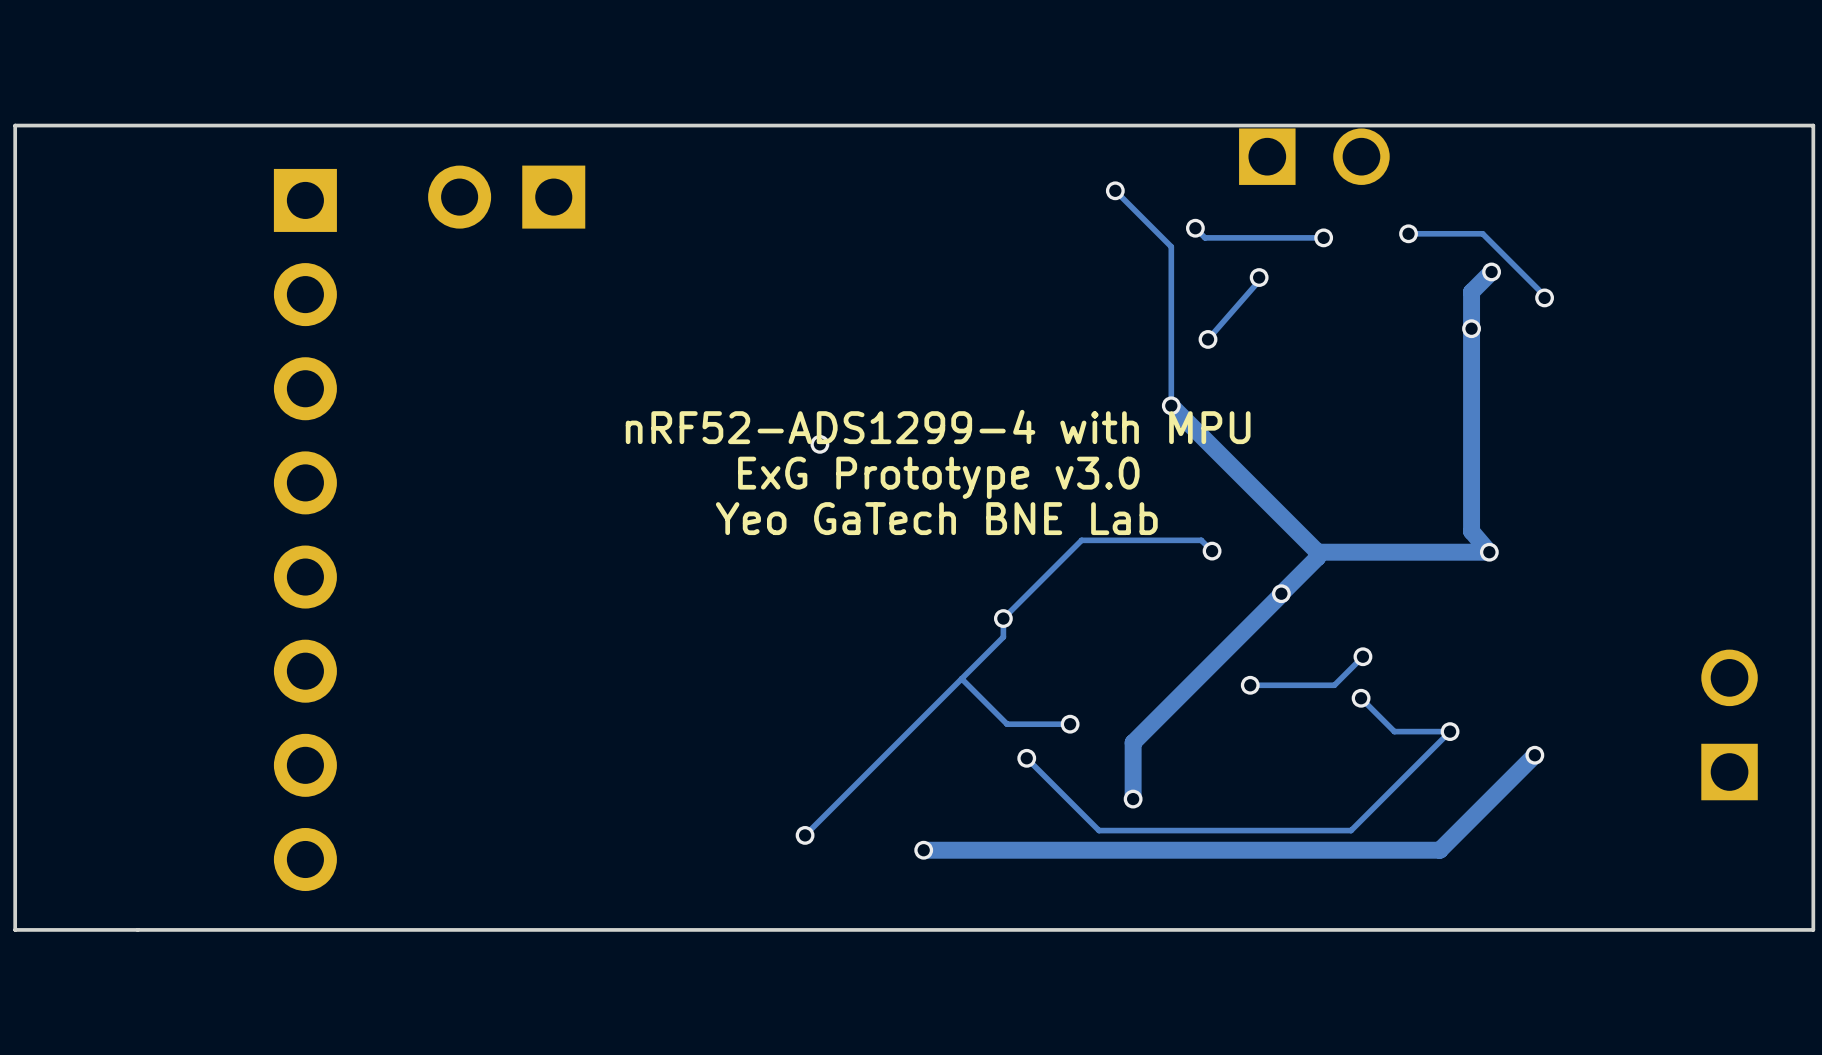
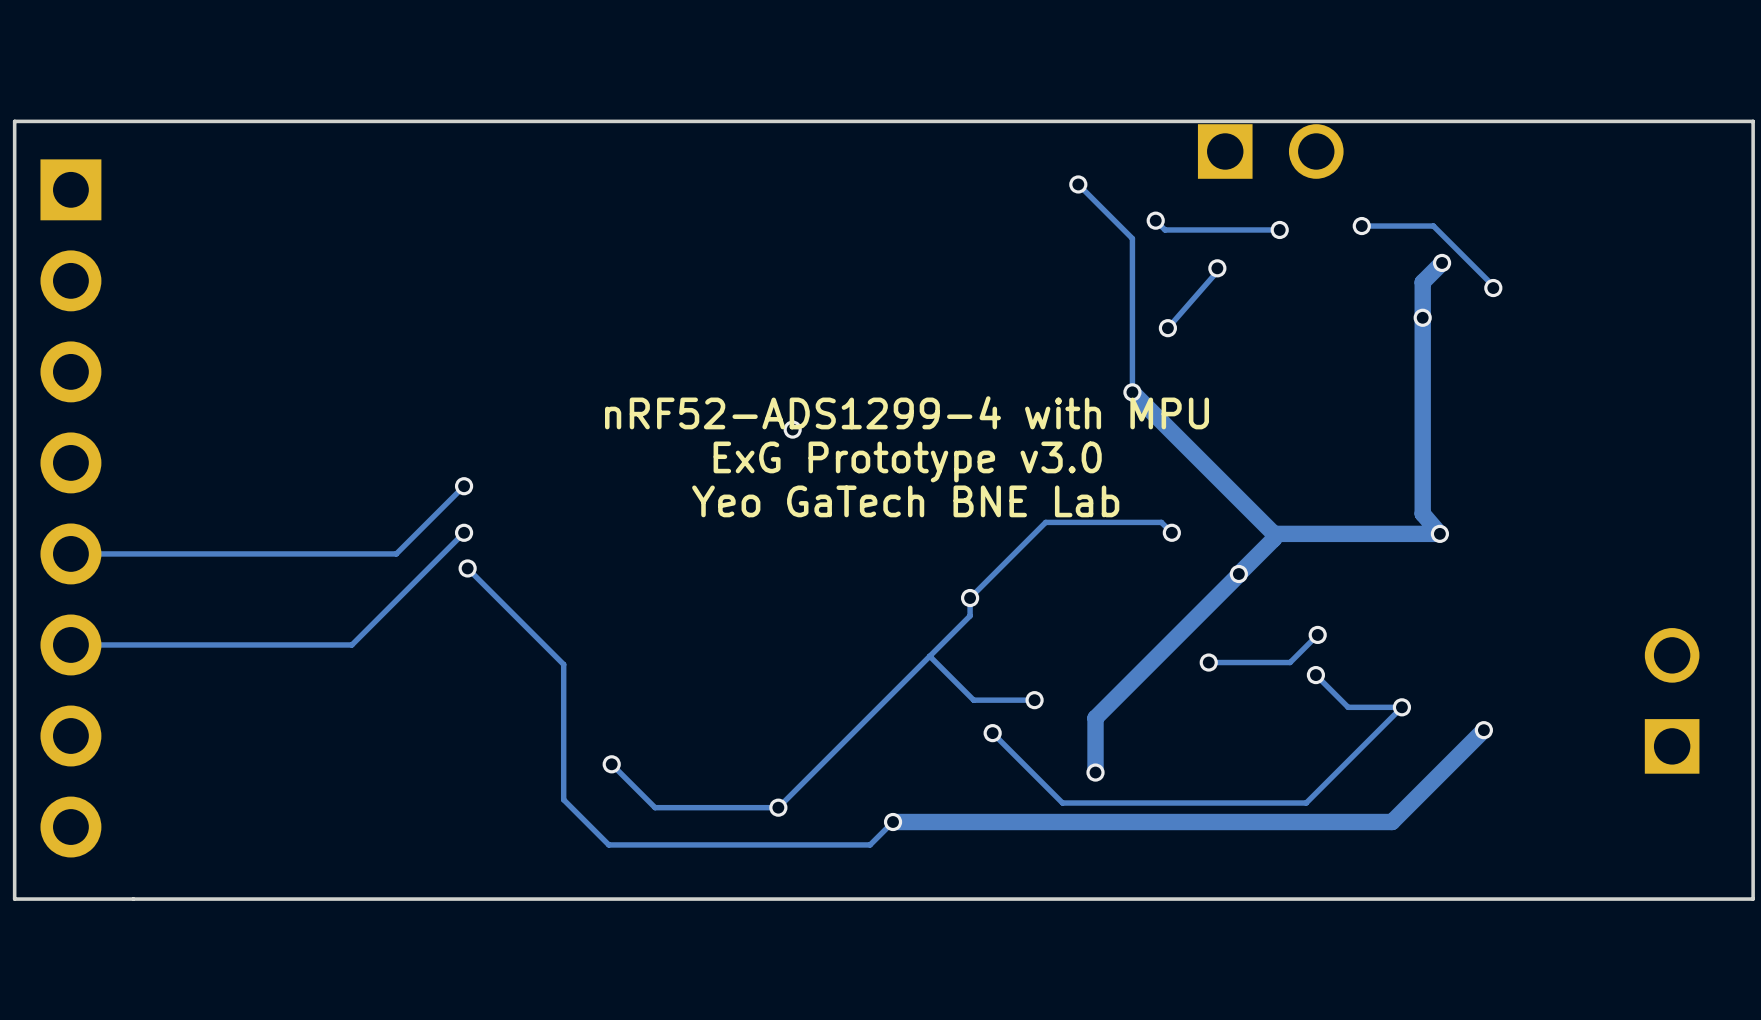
part: (506, 197) -> none
track: none -> (464, 486) (396, 553) (70, 553)
via: none -> (464, 486)
part position: (305, 529) -> (70, 508)
track: none -> (464, 532) (351, 644) (70, 644)
via: none -> (464, 532)
track: none -> (467, 568) (563, 664) (563, 799) (608, 844) (870, 844) (893, 822)
via: none -> (467, 568)
track: none -> (611, 764) (655, 807) (778, 807)
via: none -> (611, 764)

